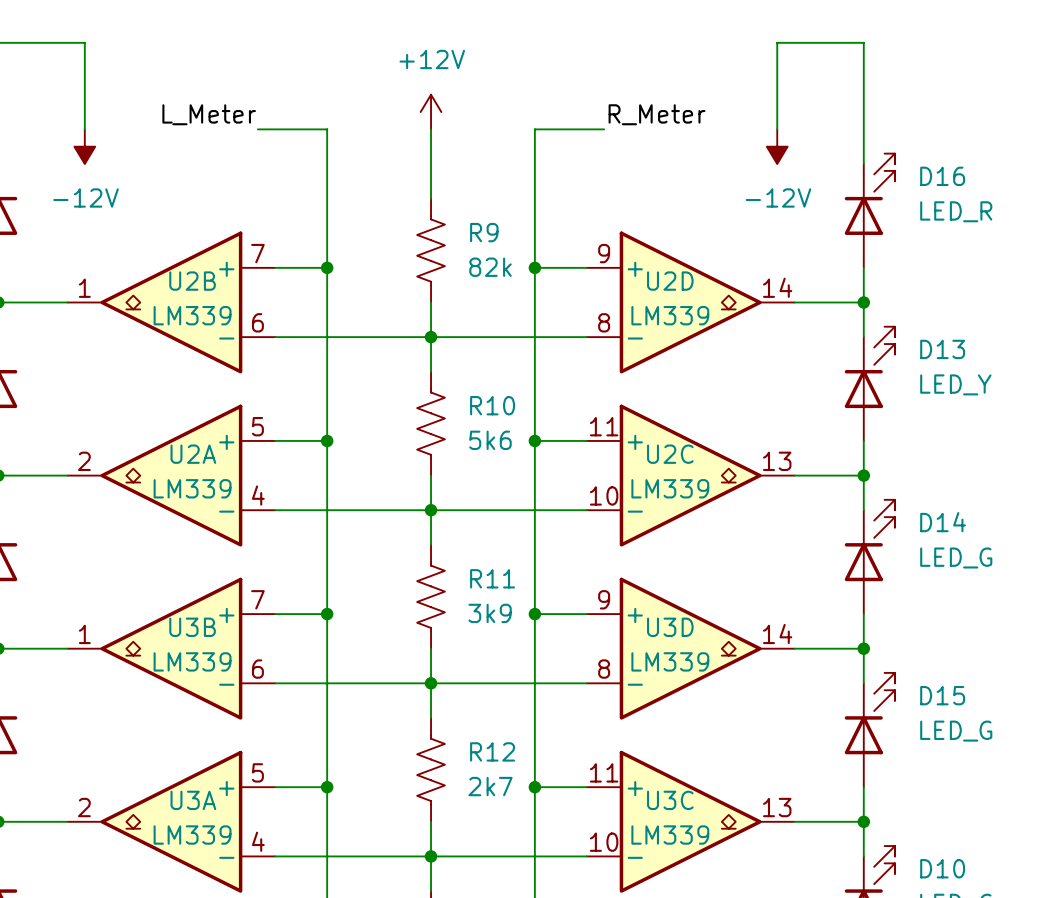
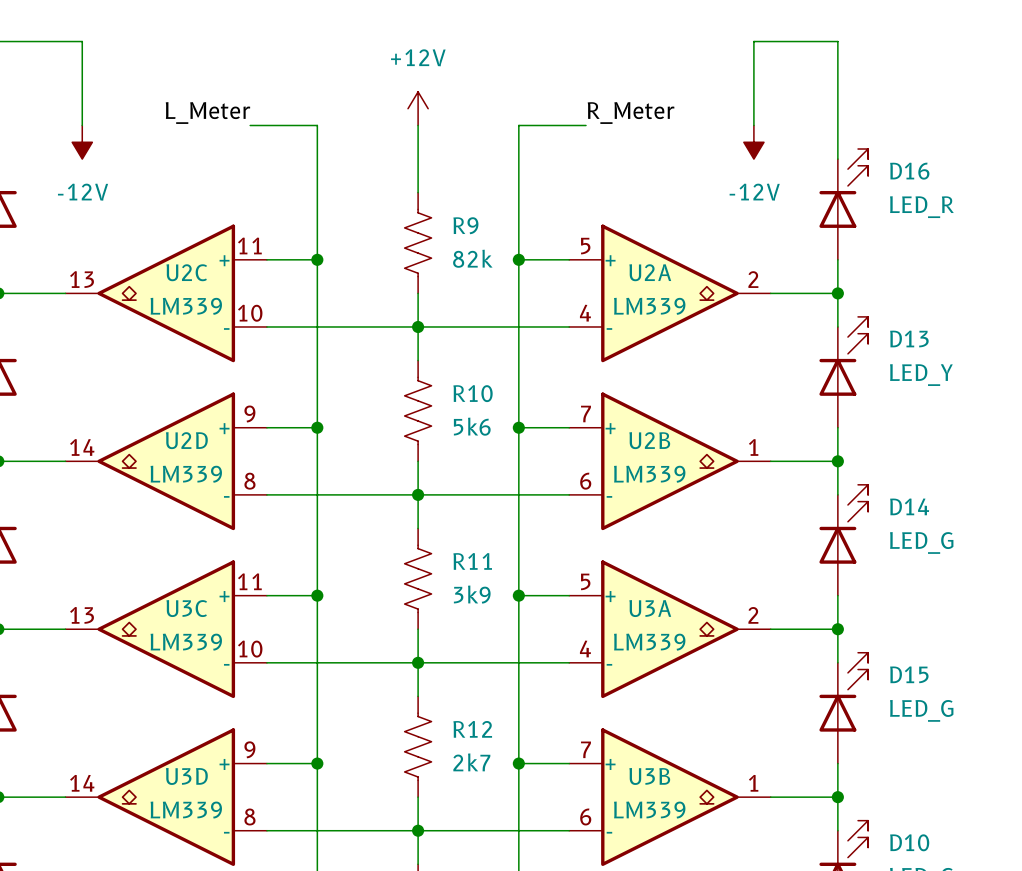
U2B flip: as is (171, 302) -> left-right (669, 461)
U2B position: (171, 302) -> (669, 461)
U2D flip: as is (690, 302) -> left-right (166, 461)
U2D position: (690, 302) -> (166, 461)
U2A flip: as is (171, 475) -> left-right (669, 293)
U2A position: (171, 475) -> (669, 293)
U2C flip: as is (690, 475) -> left-right (166, 293)
U2C position: (690, 475) -> (166, 293)
U3B flip: as is (171, 648) -> left-right (669, 797)
U3B position: (171, 648) -> (669, 797)
U3D flip: as is (690, 648) -> left-right (166, 797)
U3D position: (690, 648) -> (166, 797)
U3A flip: as is (171, 821) -> left-right (669, 629)
U3A position: (171, 821) -> (669, 629)
U3C flip: as is (690, 821) -> left-right (166, 629)
U3C position: (690, 821) -> (166, 629)

